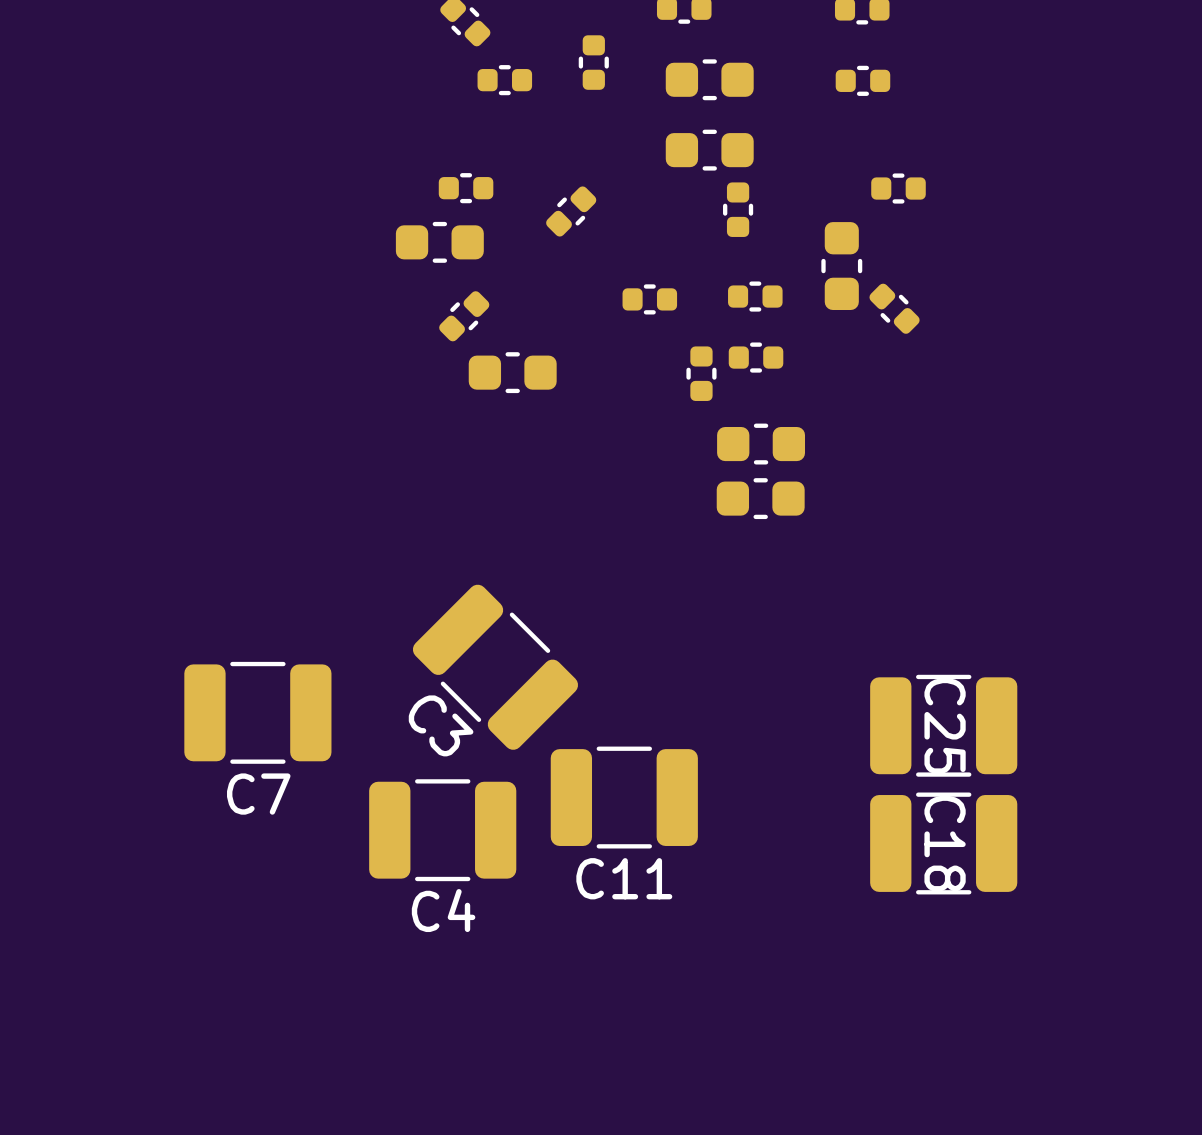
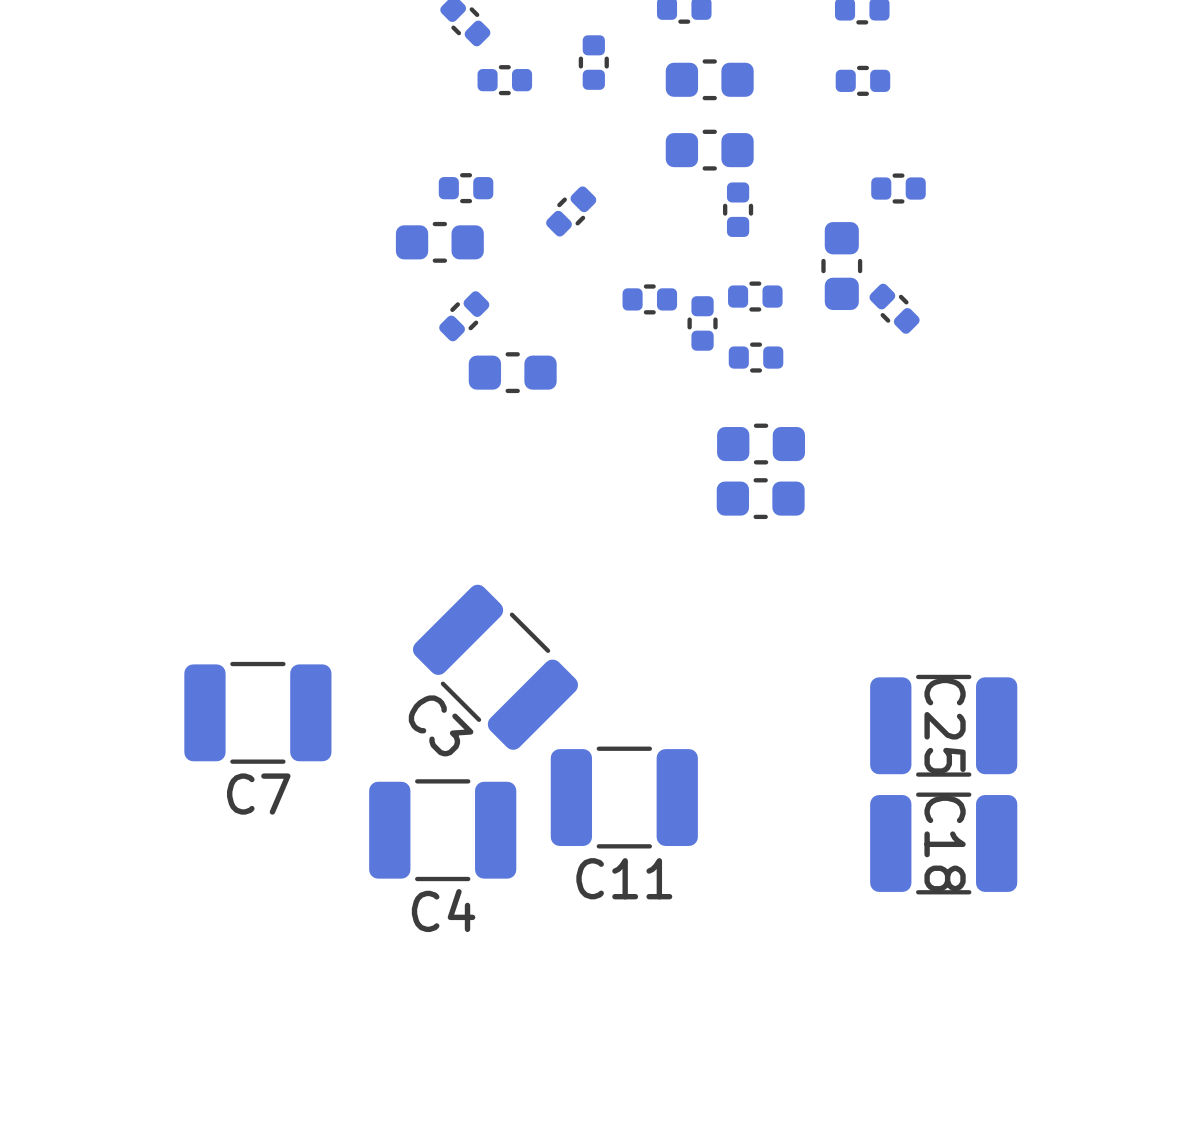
part position: (701, 373) -> (702, 323)

